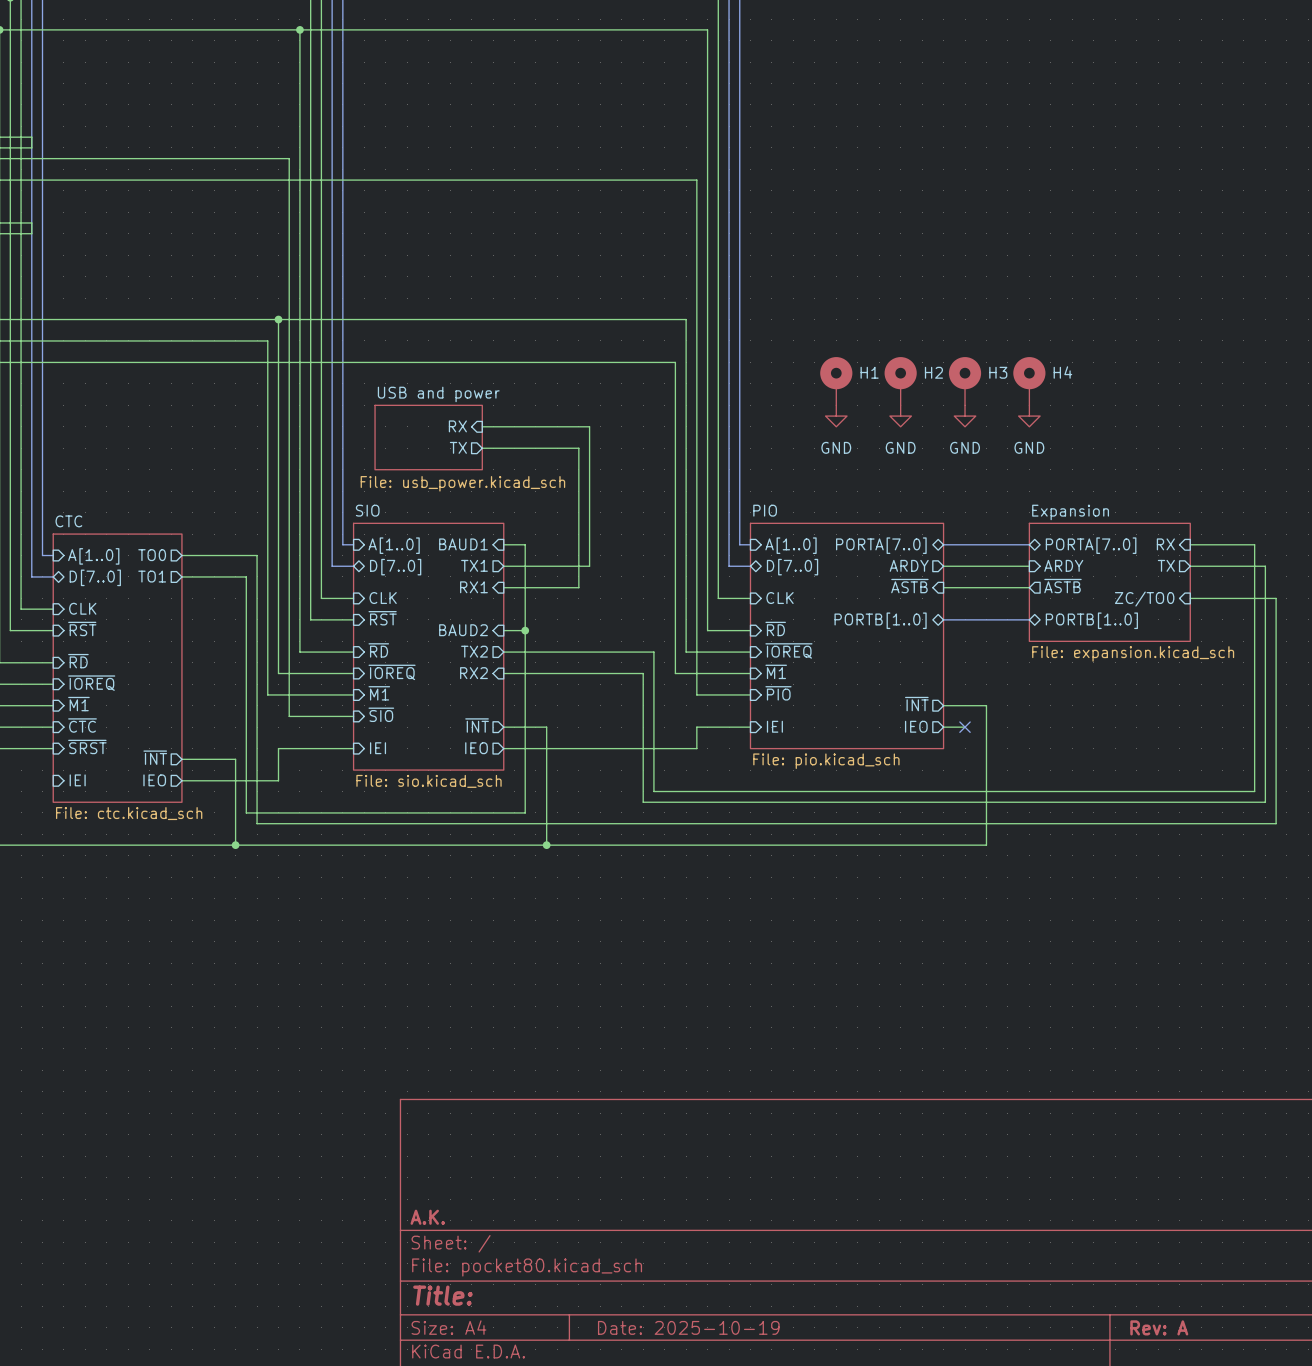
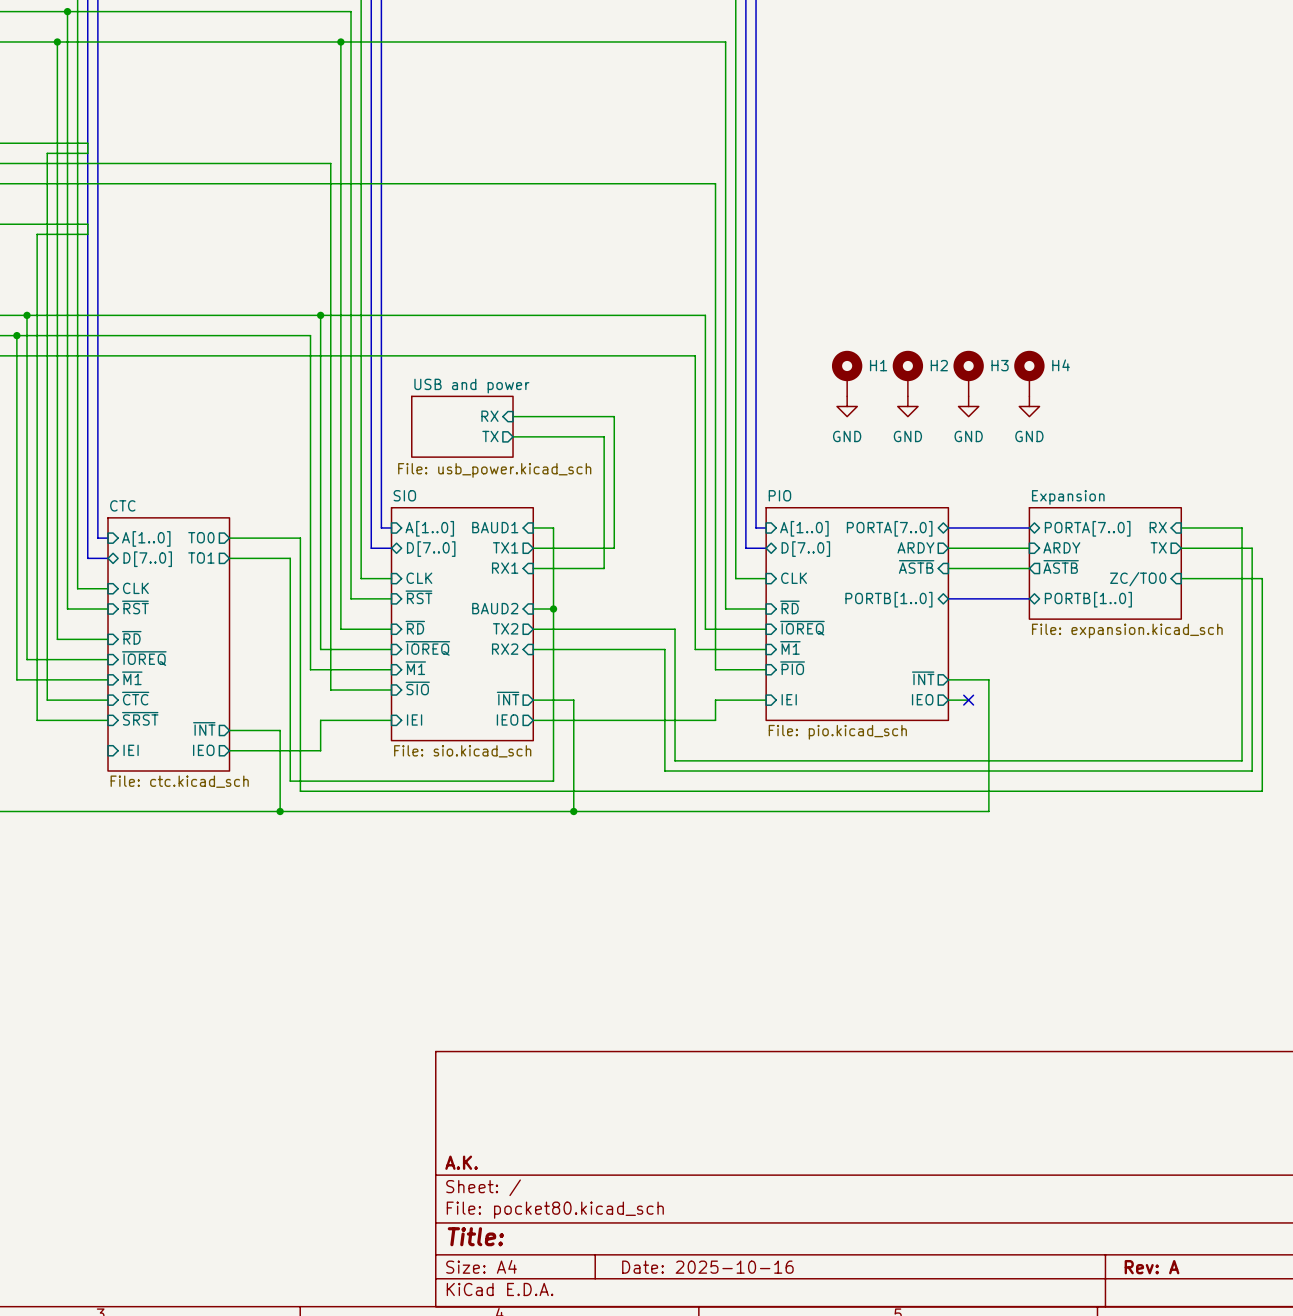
title block: Date: 2025-10-19 (688, 1327) -> Date: 2025-10-16 (707, 1267)

